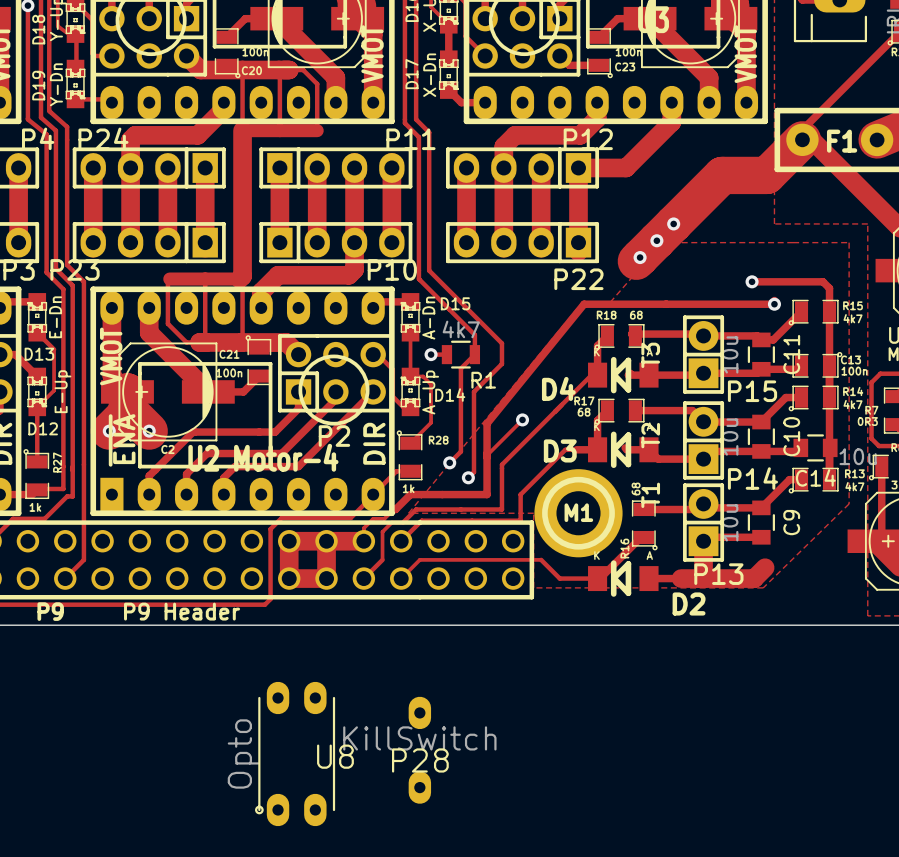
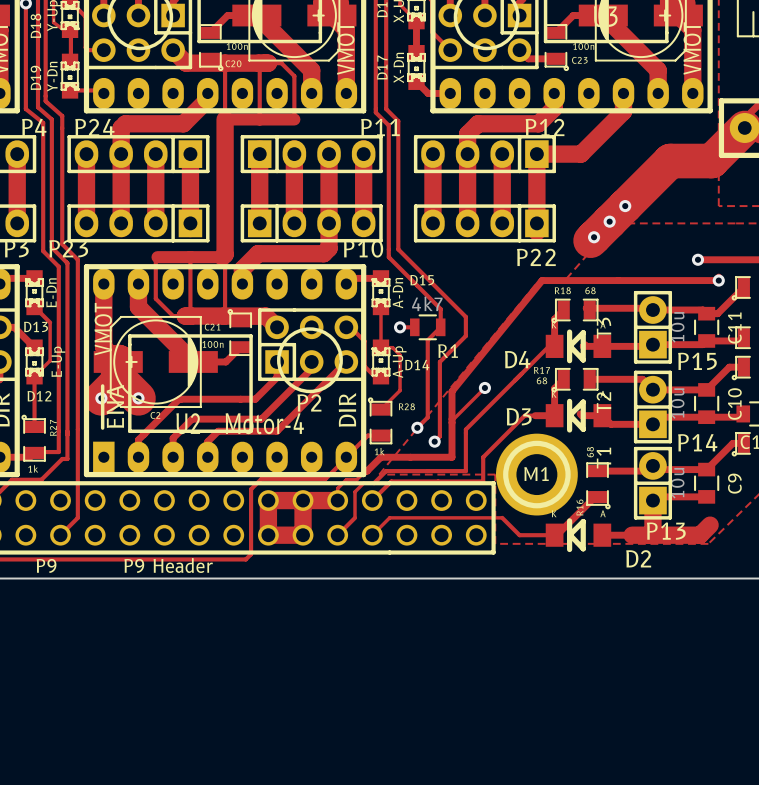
P28: KillSwitch (419, 750) -> none
U8: Opto (295, 754) -> none

